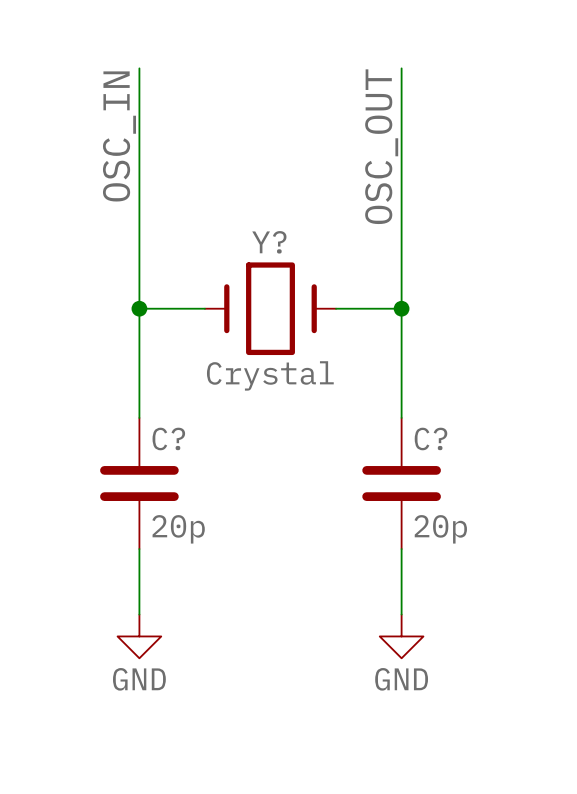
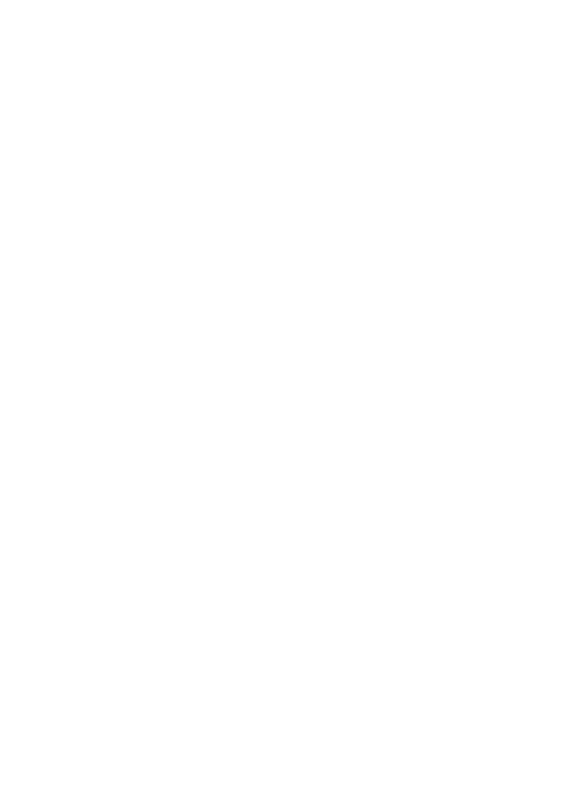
wire: (139, 68) (139, 417) -> none
wire: (401, 68) (401, 417) -> none
label: OSC_IN (119, 136) -> none
label: OSC_OUT (381, 146) -> none
wire: (139, 308) (204, 308) -> none
junction: (139, 308) -> none
Y?: Crystal (270, 308) -> none
wire: (336, 308) (401, 308) -> none
junction: (401, 308) -> none
C?: 20p (139, 483) -> none
C?: 20p (401, 483) -> none
wire: (139, 549) (139, 614) -> none
wire: (401, 549) (401, 614) -> none
power symbol: GND (139, 636) -> none
power symbol: GND (401, 636) -> none

